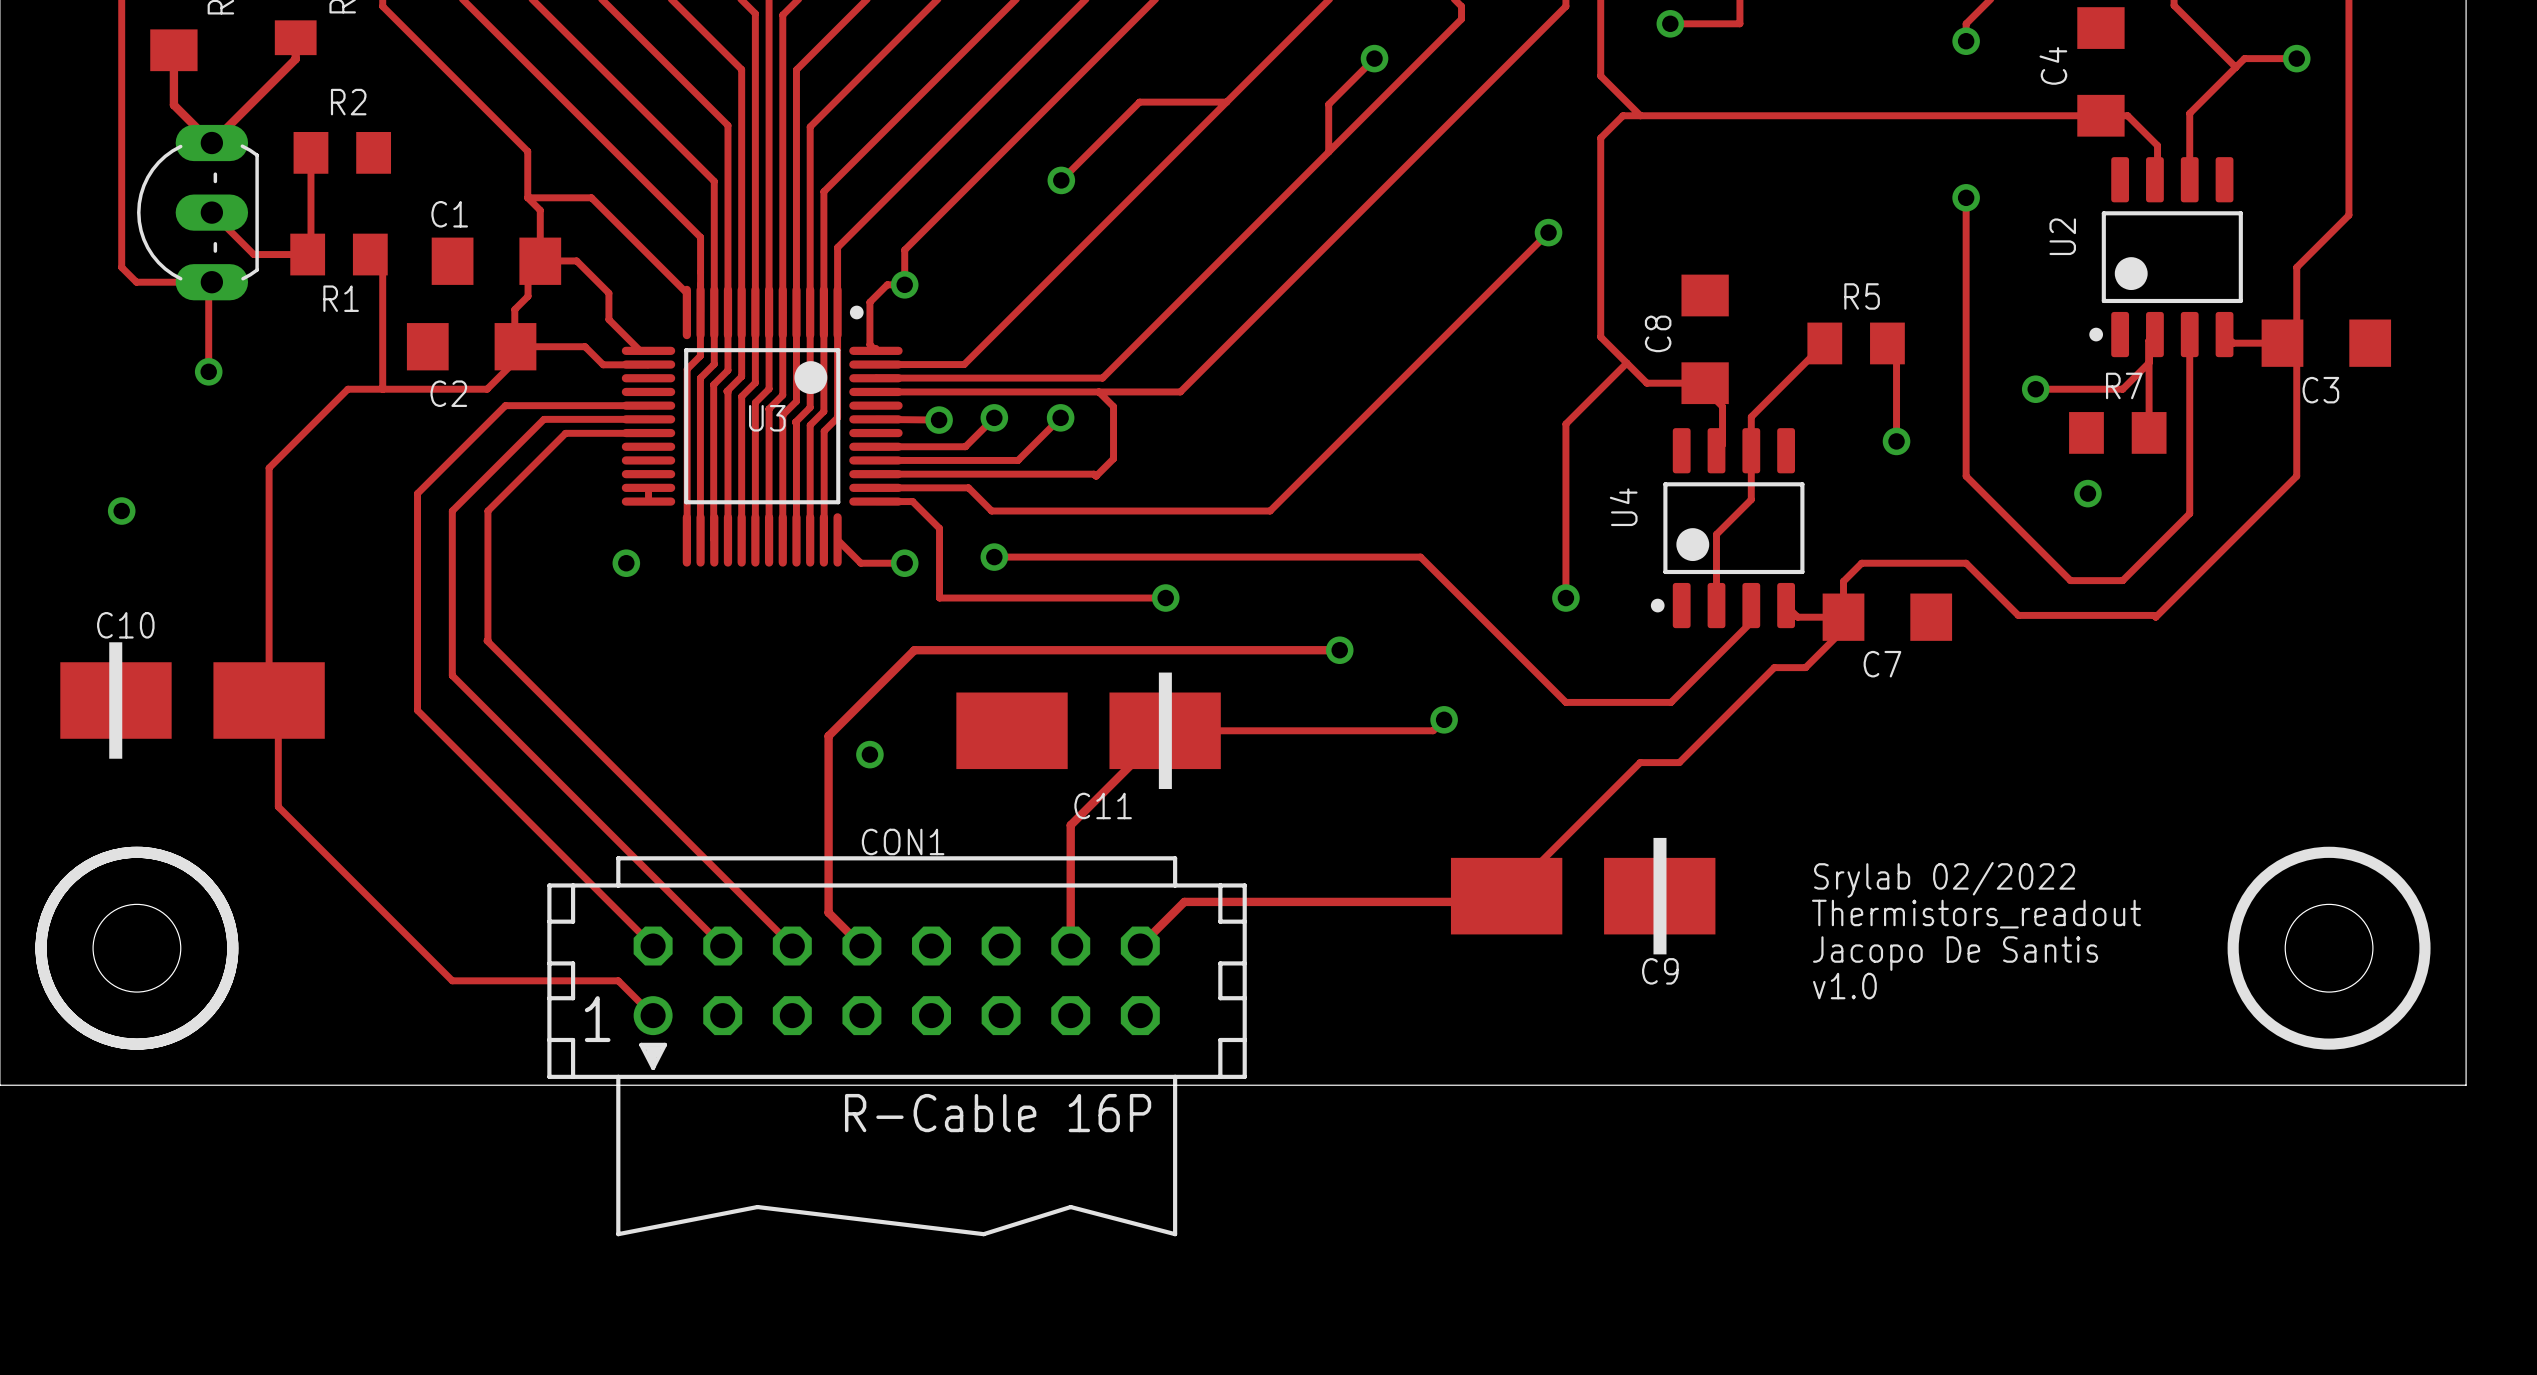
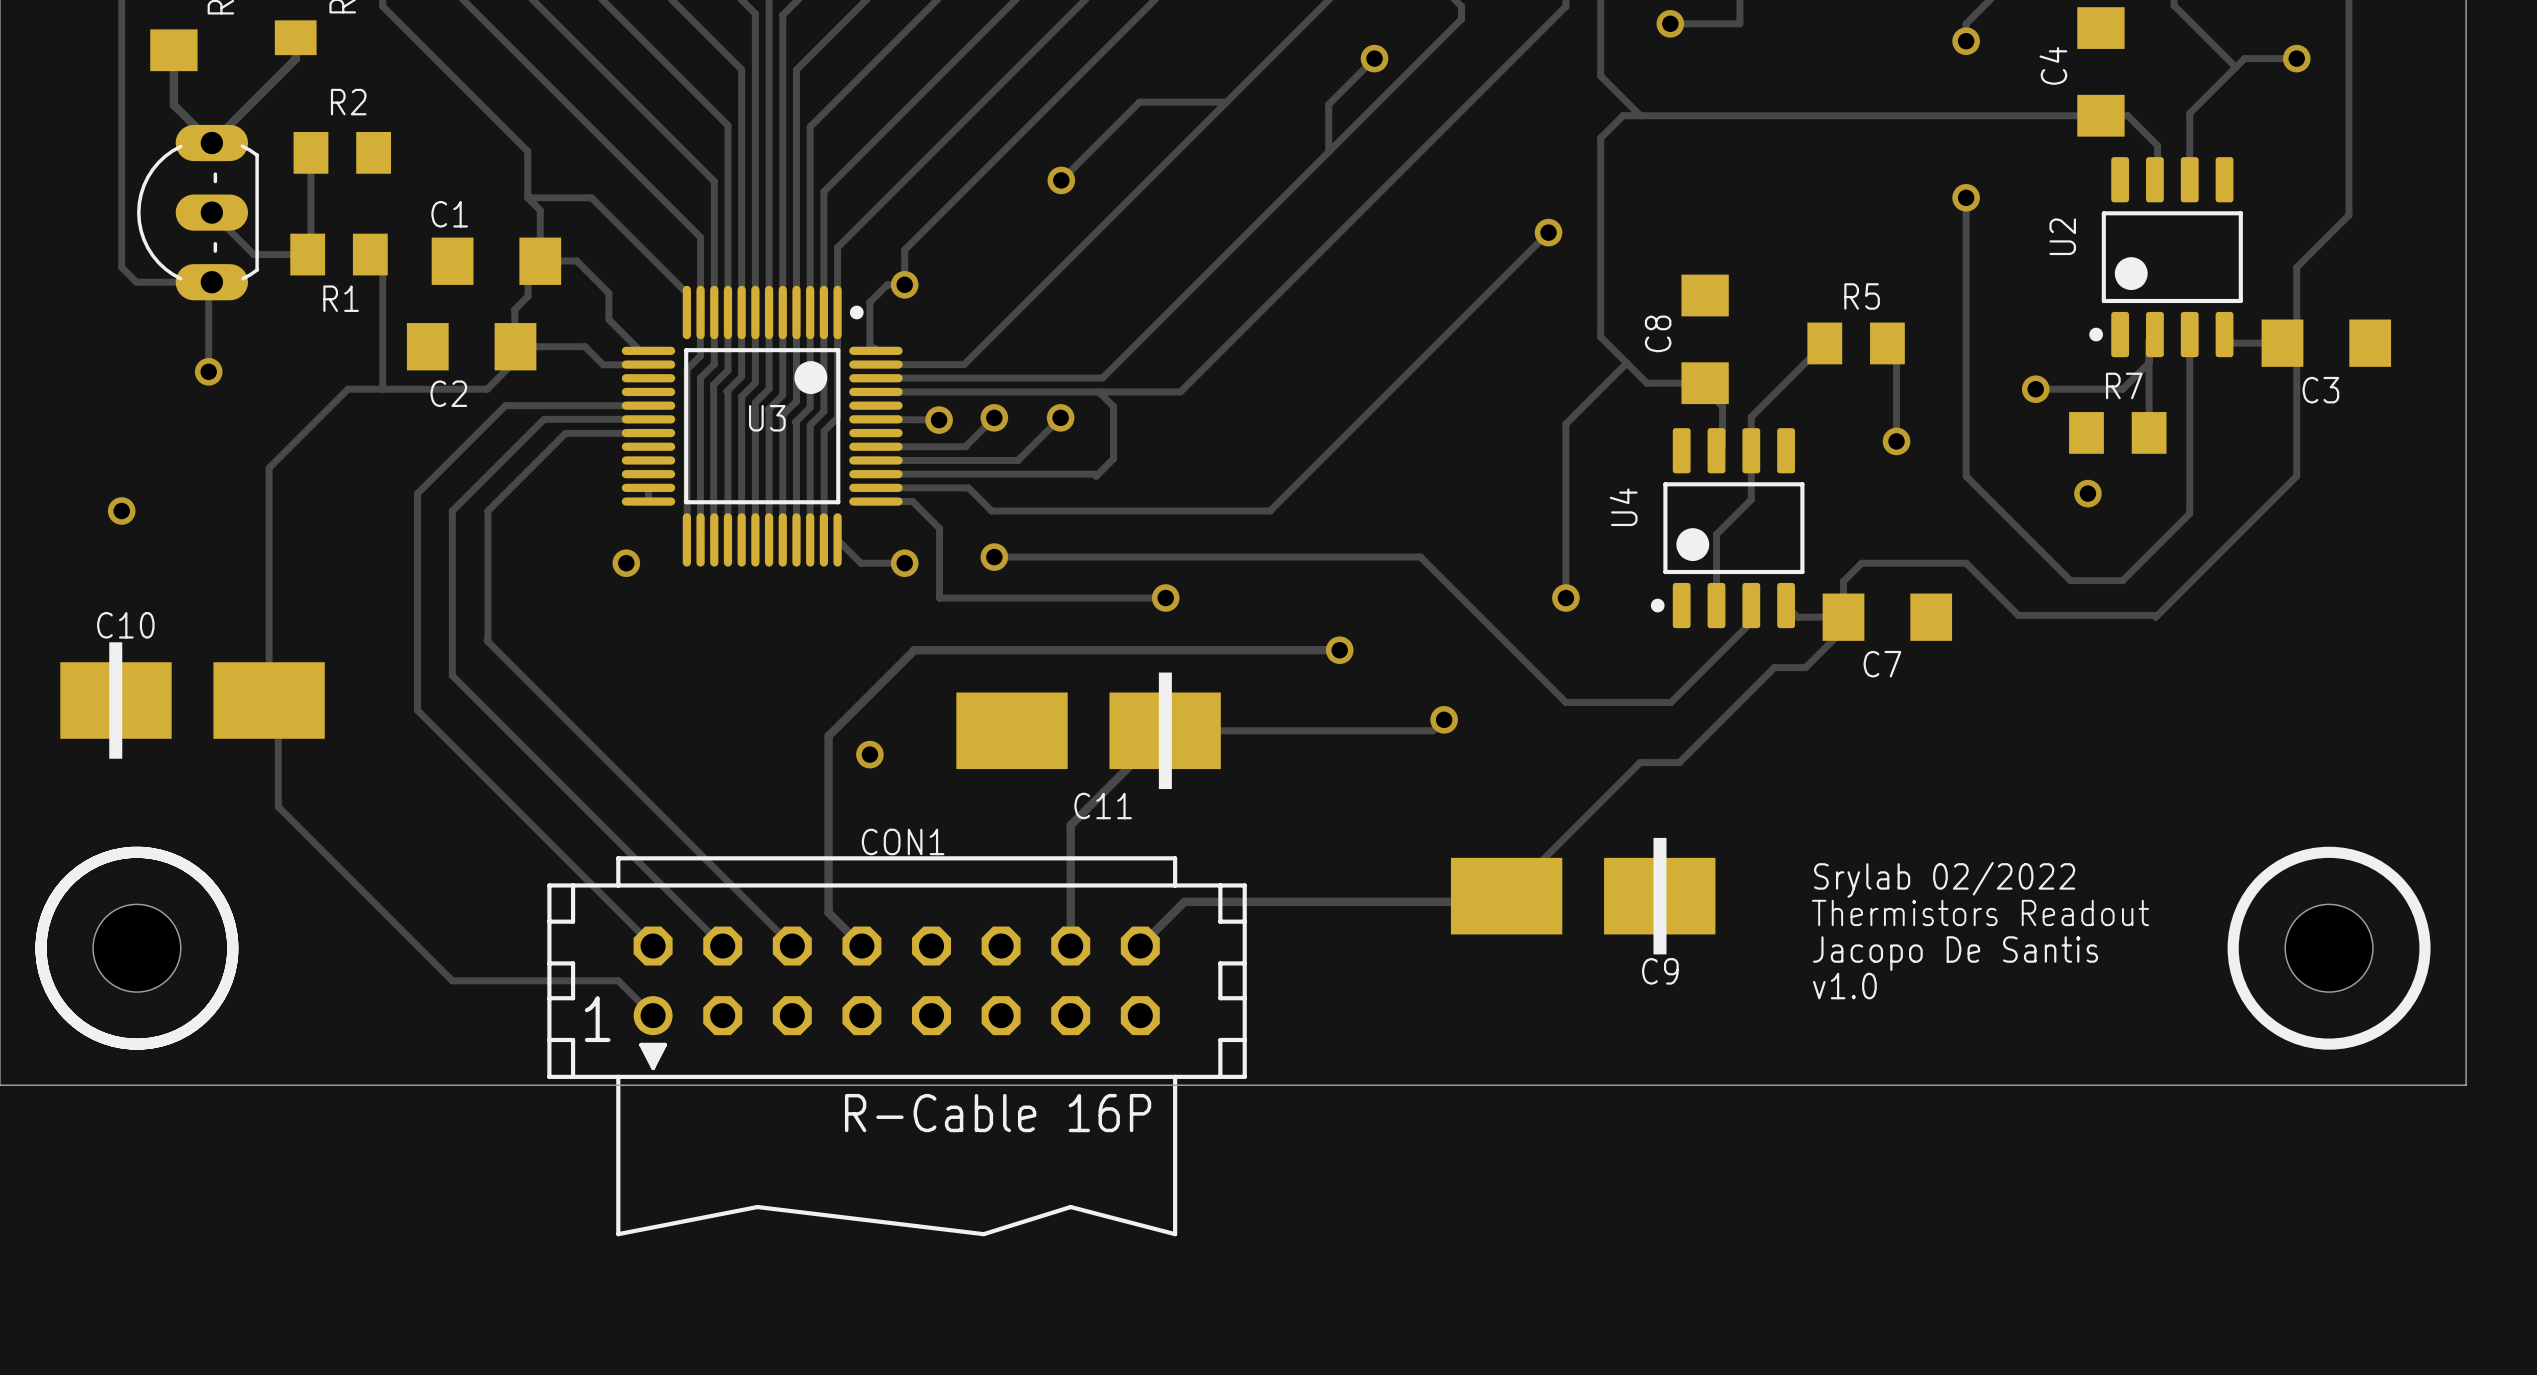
text: Thermistors_readout (1976, 914) -> Thermistors Readout (1980, 912)

